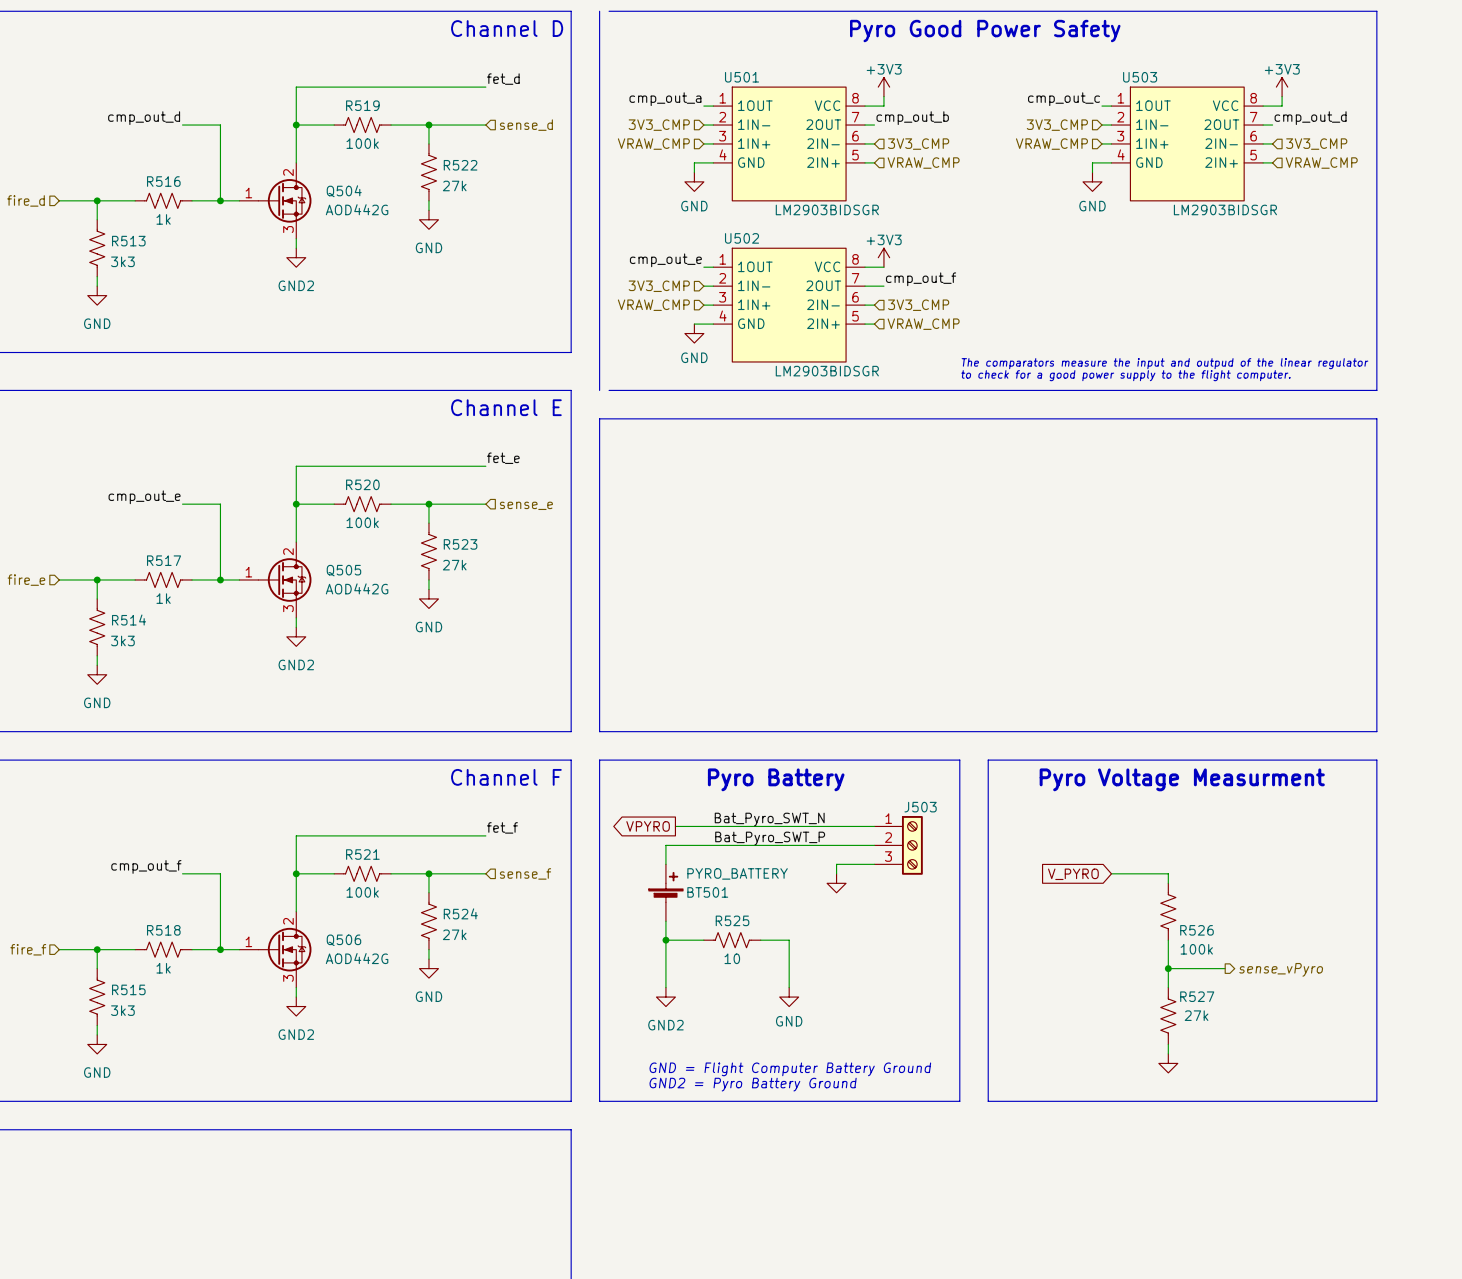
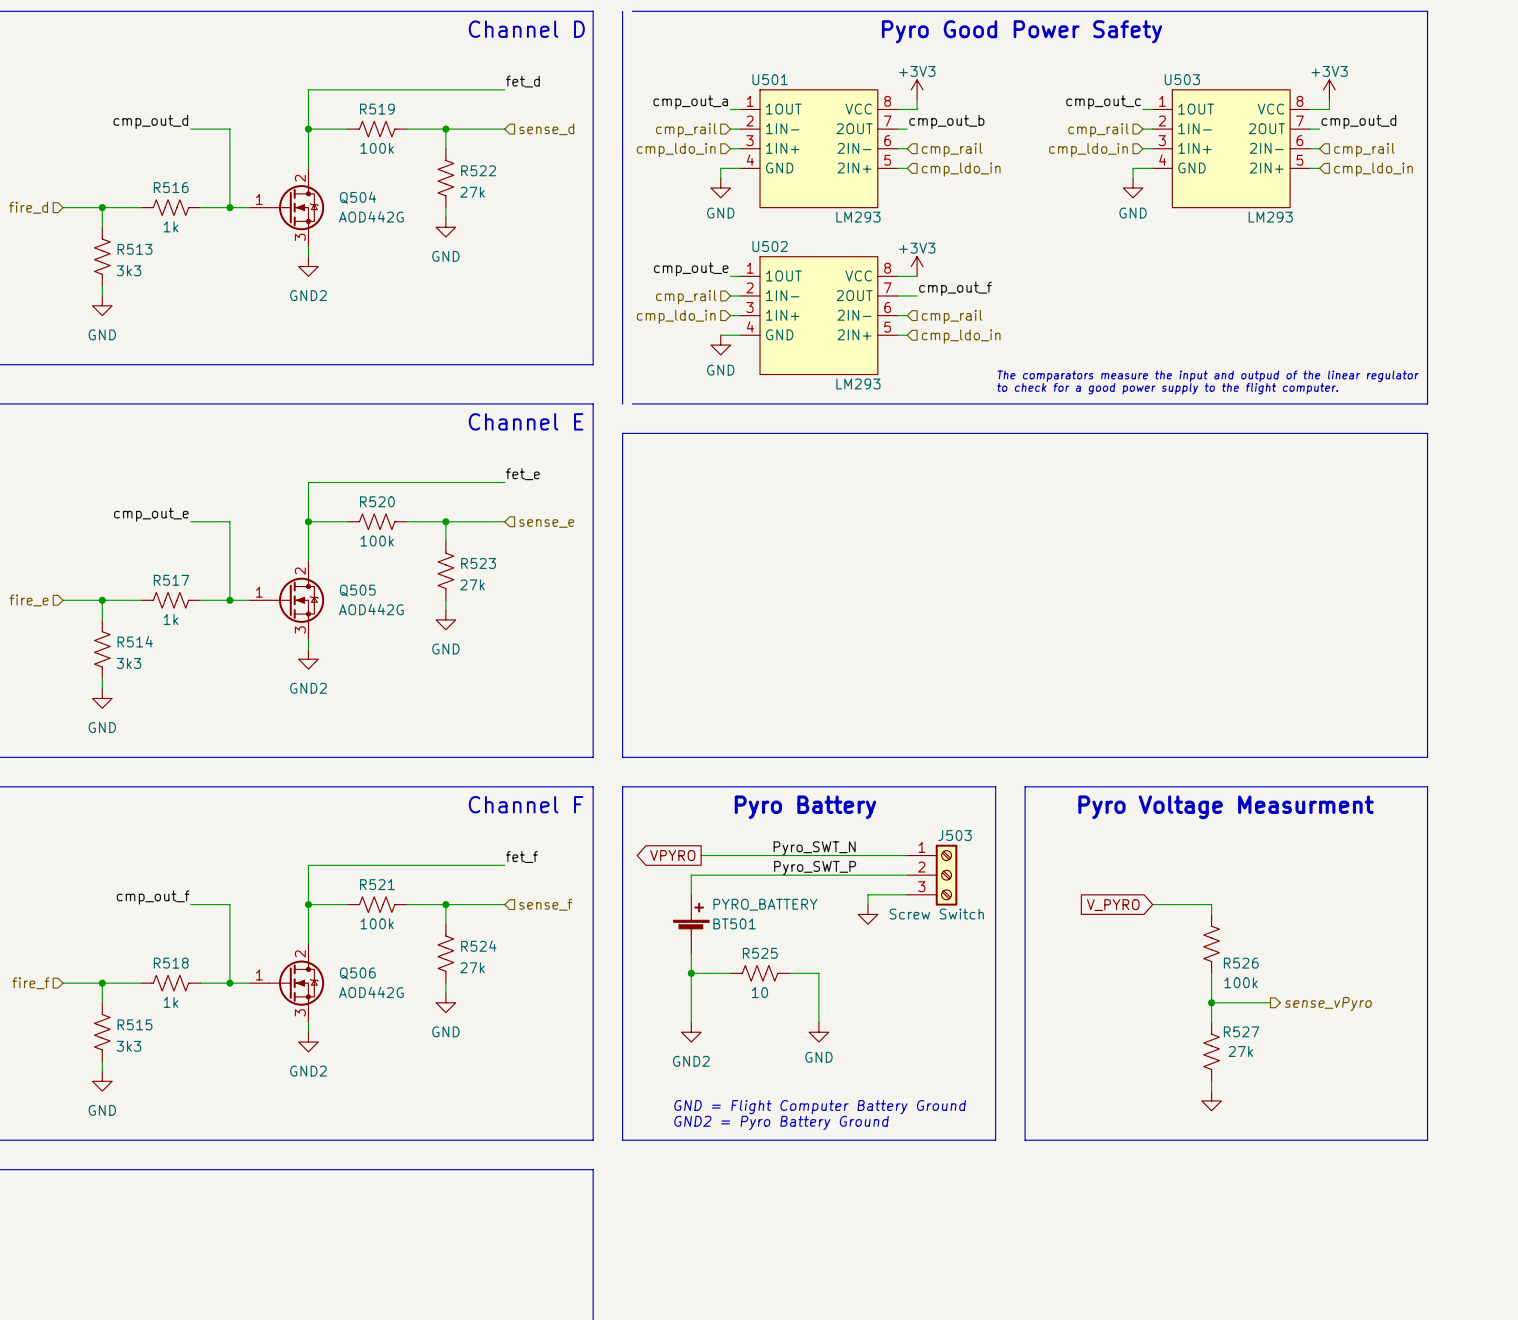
hierarchical label: 3V3_CMP (659, 125) -> cmp_rail (686, 130)
hierarchical label: 3V3_CMP (1057, 125) -> cmp_rail (1098, 130)
hierarchical label: VRAW_CMP (653, 144) -> cmp_ldo_in (676, 150)
hierarchical label: 3V3_CMP (918, 144) -> cmp_rail (952, 150)
hierarchical label: VRAW_CMP (1051, 144) -> cmp_ldo_in (1088, 150)
hierarchical label: 3V3_CMP (1316, 144) -> cmp_rail (1364, 150)
hierarchical label: VRAW_CMP (923, 163) -> cmp_ldo_in (961, 169)
hierarchical label: VRAW_CMP (1321, 163) -> cmp_ldo_in (1373, 169)
U501 value: LM2903BIDSGR (827, 209) -> LM293 (858, 217)
U503 value: LM2903BIDSGR (1225, 209) -> LM293 (1270, 217)
hierarchical label: 3V3_CMP (659, 286) -> cmp_rail (686, 297)
hierarchical label: VRAW_CMP (653, 305) -> cmp_ldo_in (676, 316)
hierarchical label: 3V3_CMP (918, 305) -> cmp_rail (952, 316)
hierarchical label: VRAW_CMP (923, 324) -> cmp_ldo_in (961, 336)
U502 value: LM2903BIDSGR (827, 371) -> LM293 (858, 383)
label: Bat_Pyro_SWT_N (769, 819) -> Pyro_SWT_N (814, 848)
label: Bat_Pyro_SWT_P (770, 838) -> Pyro_SWT_P (815, 868)
J503 value: none -> Screw Switch (936, 914)

